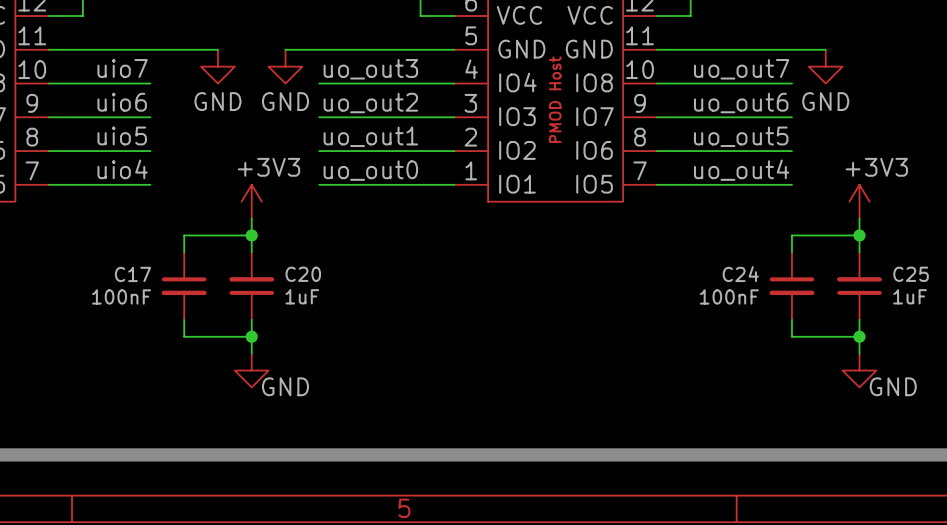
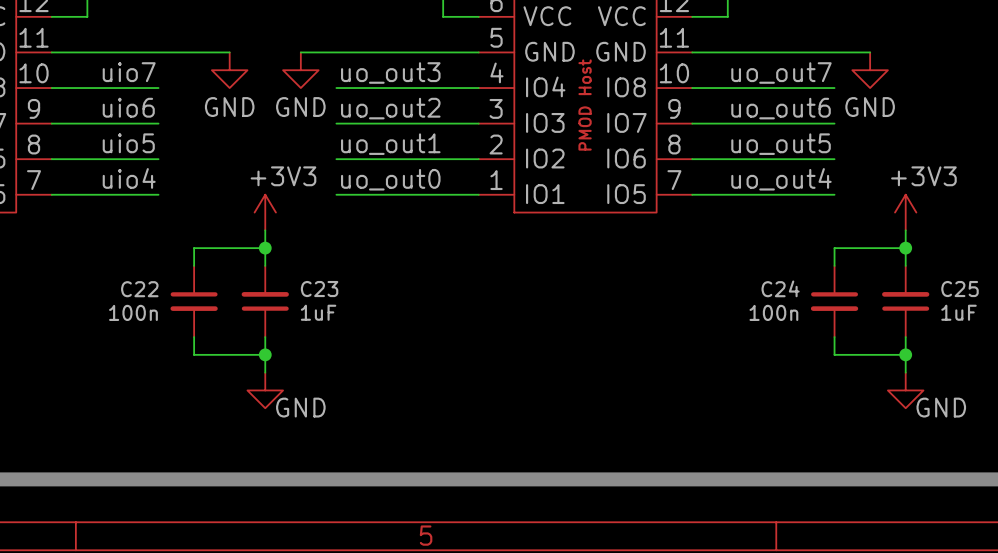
C17 name: C17 (132, 274) -> C22 (139, 289)
C20 name: C20 (303, 274) -> C23 (319, 289)
C17 value: 100nF (121, 296) -> 100n (133, 312)
C24 value: 100nF (729, 296) -> 100n (773, 312)

